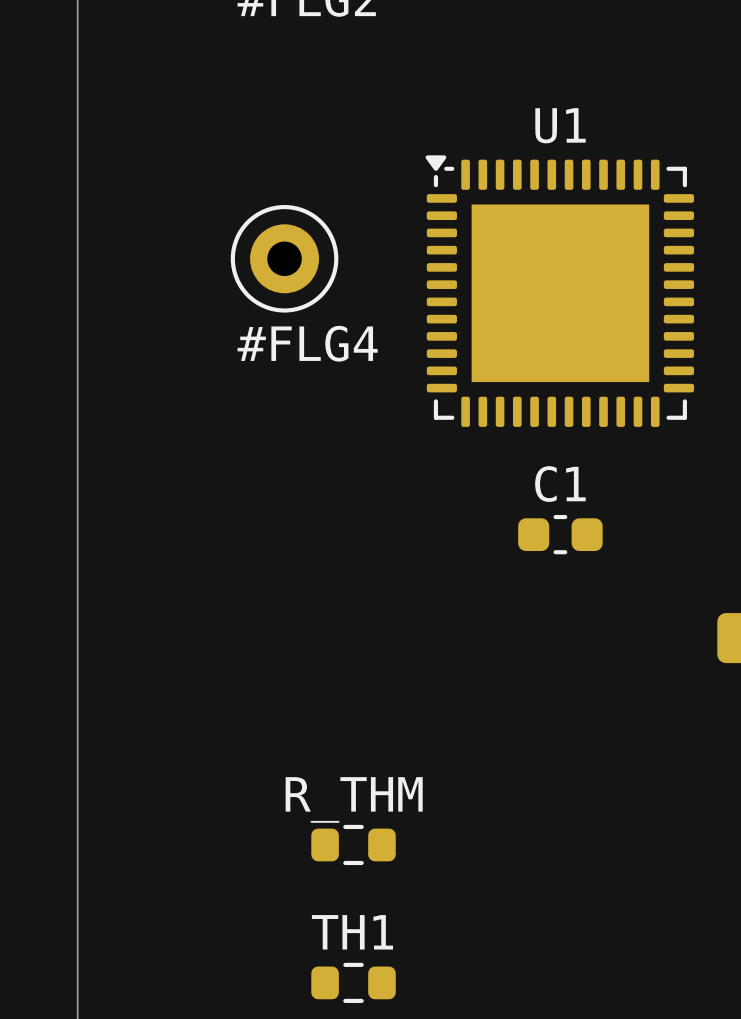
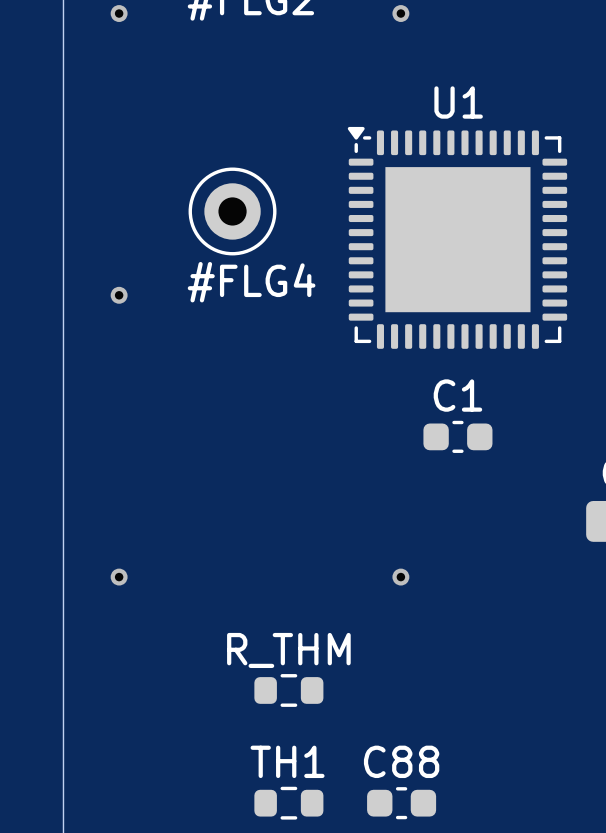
via: none -> (119, 13)
via: none -> (400, 13)
via: none -> (119, 295)
via: none -> (119, 577)
via: none -> (400, 577)
C88: none -> (401, 803)

